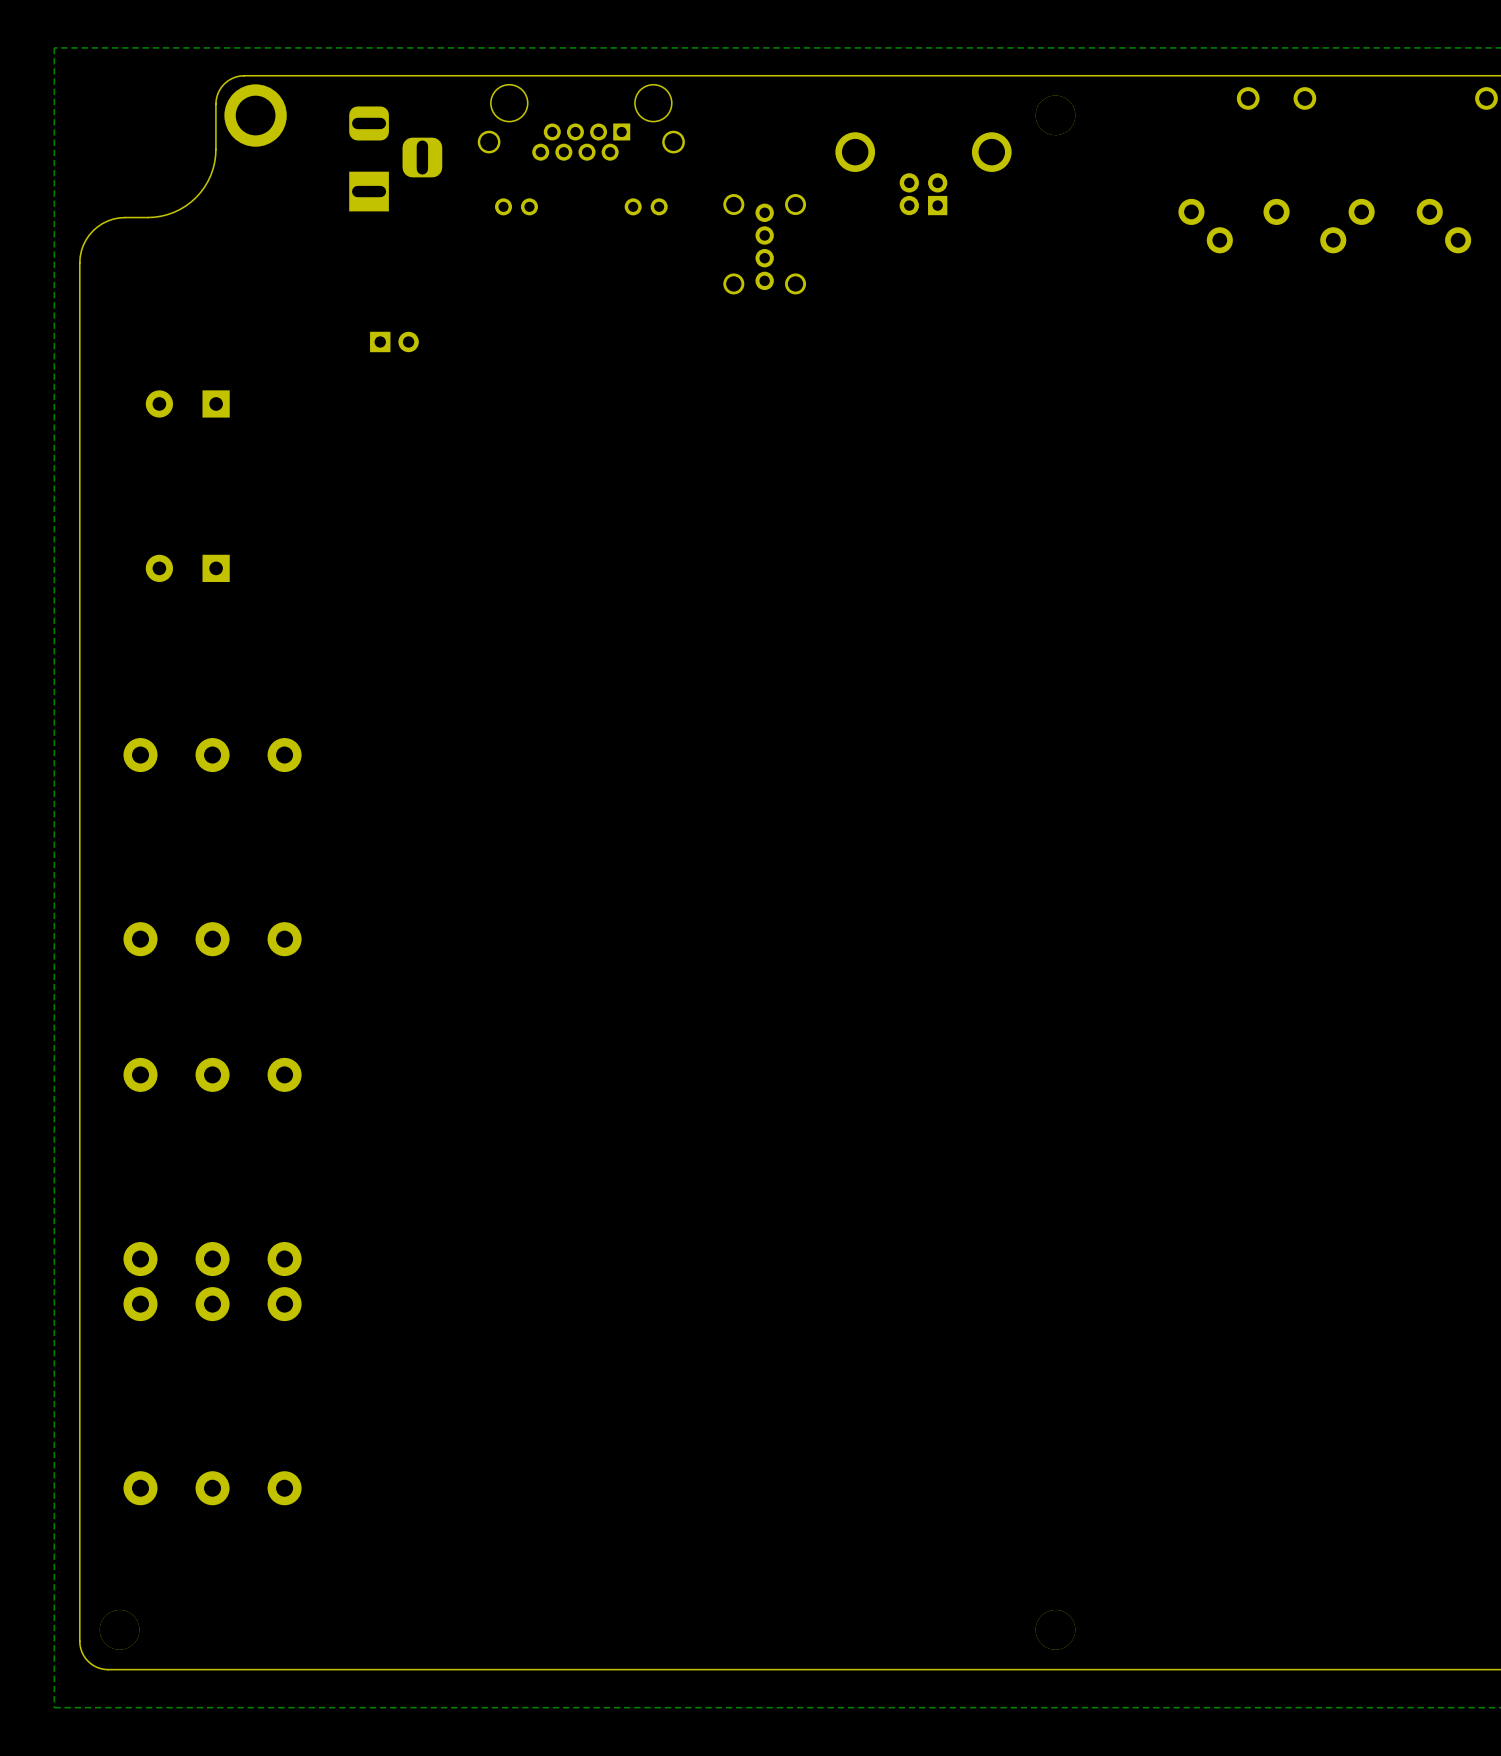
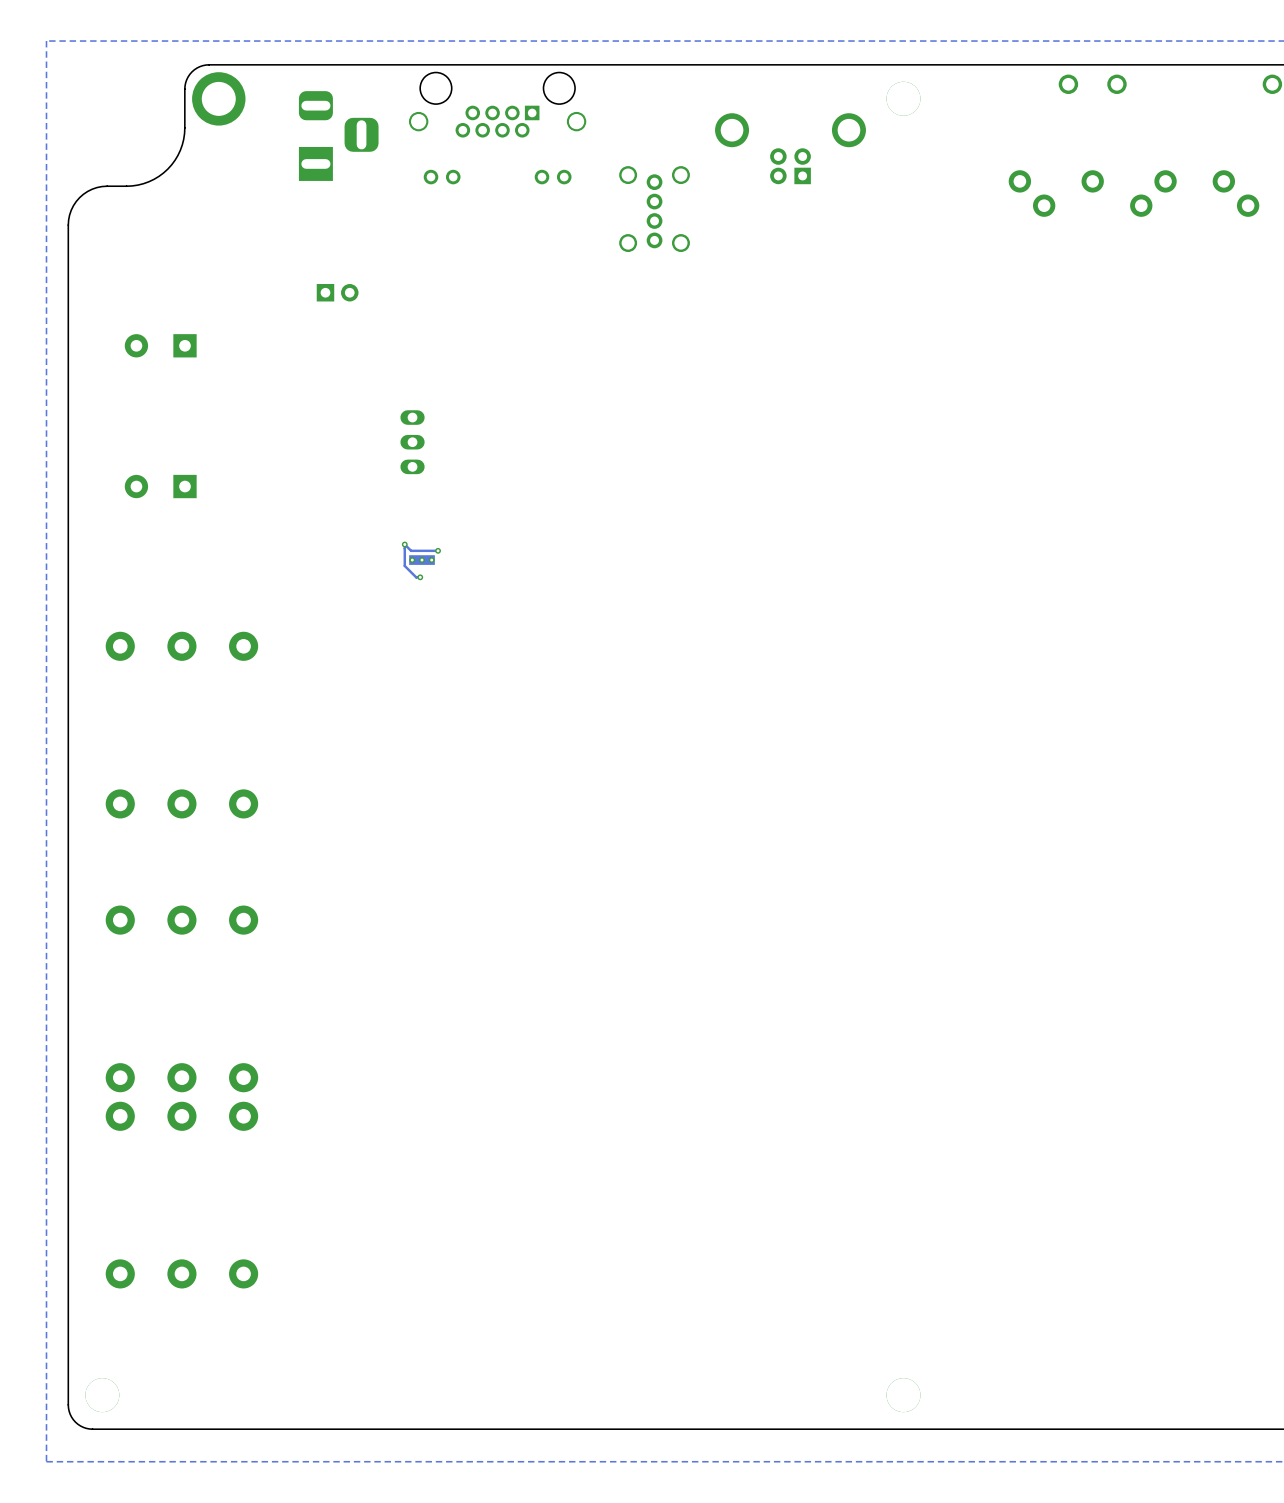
part: none -> (412, 442)
via: none -> (404, 544)
track: none -> (438, 550) (411, 550) (404, 544) (404, 565) (416, 577) (420, 577)
via: none -> (438, 550)
part: none -> (422, 560)
via: none -> (420, 577)

